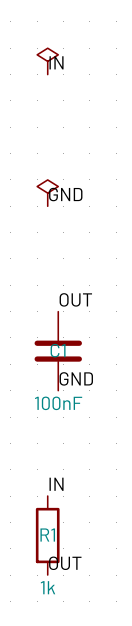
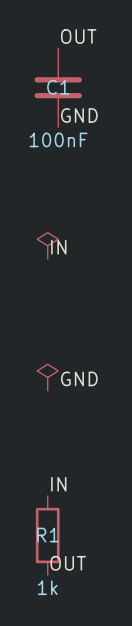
label: none -> OUT (78, 36)
power symbol: (47, 61) -> none
label position: IN (56, 62) -> IN (58, 247)
power symbol position: (47, 193) -> (47, 245)
label position: GND (65, 194) -> GND (79, 115)
label: OUT (75, 299) -> none
C1 position: (58, 351) -> (58, 87)
power symbol: none -> (47, 377)

